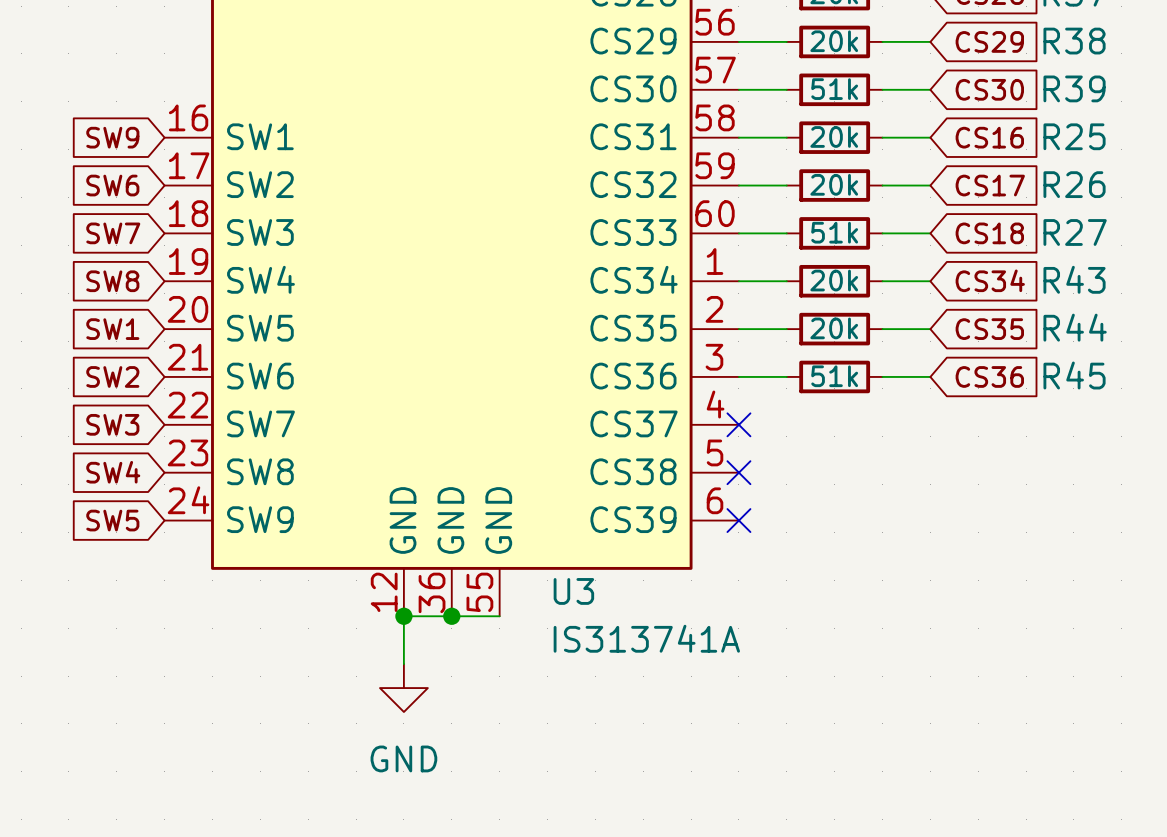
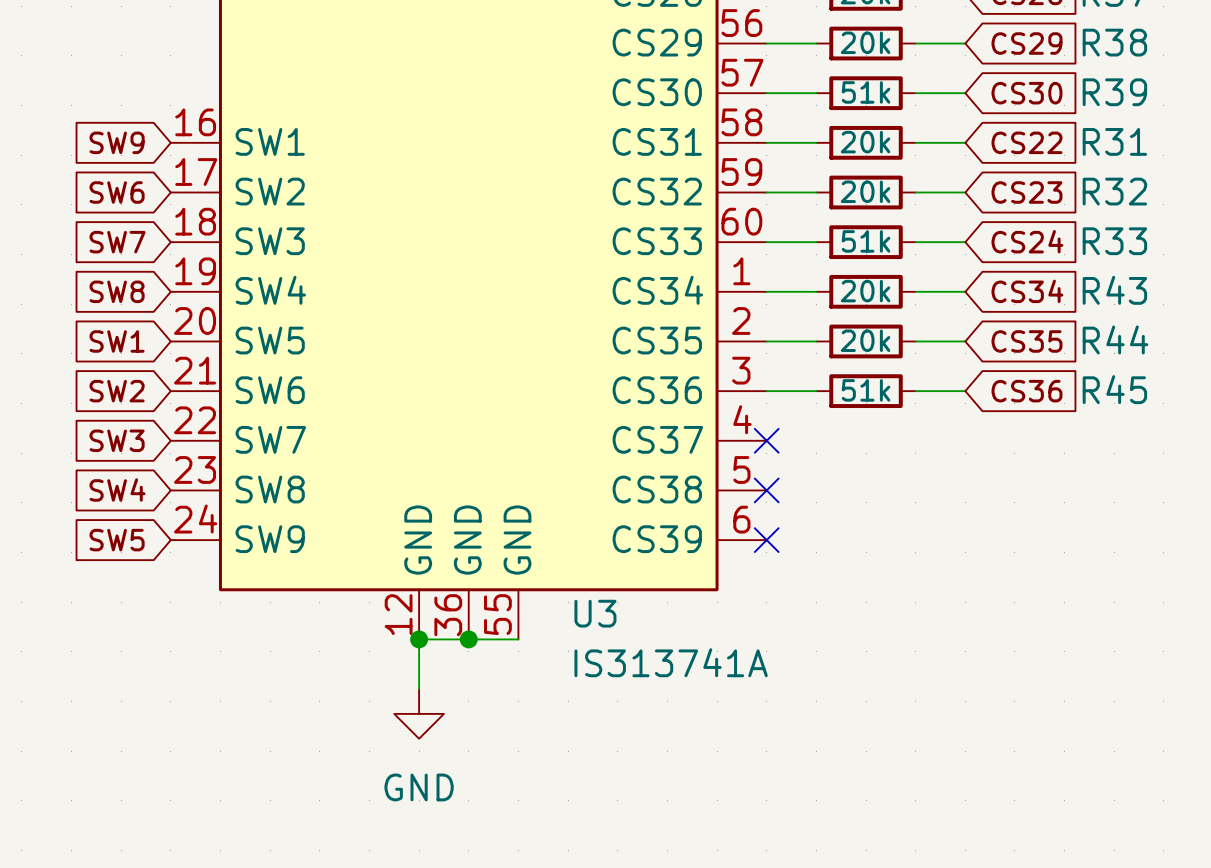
R25 name: R25 (1074, 136) -> R31 (1114, 141)
global label: CS16 (989, 137) -> CS22 (1026, 142)
R26 name: R26 (1074, 184) -> R32 (1114, 191)
global label: CS17 (990, 185) -> CS23 (1026, 192)
R27 name: R27 (1075, 232) -> R33 (1114, 241)
global label: CS18 (989, 233) -> CS24 (1027, 241)

